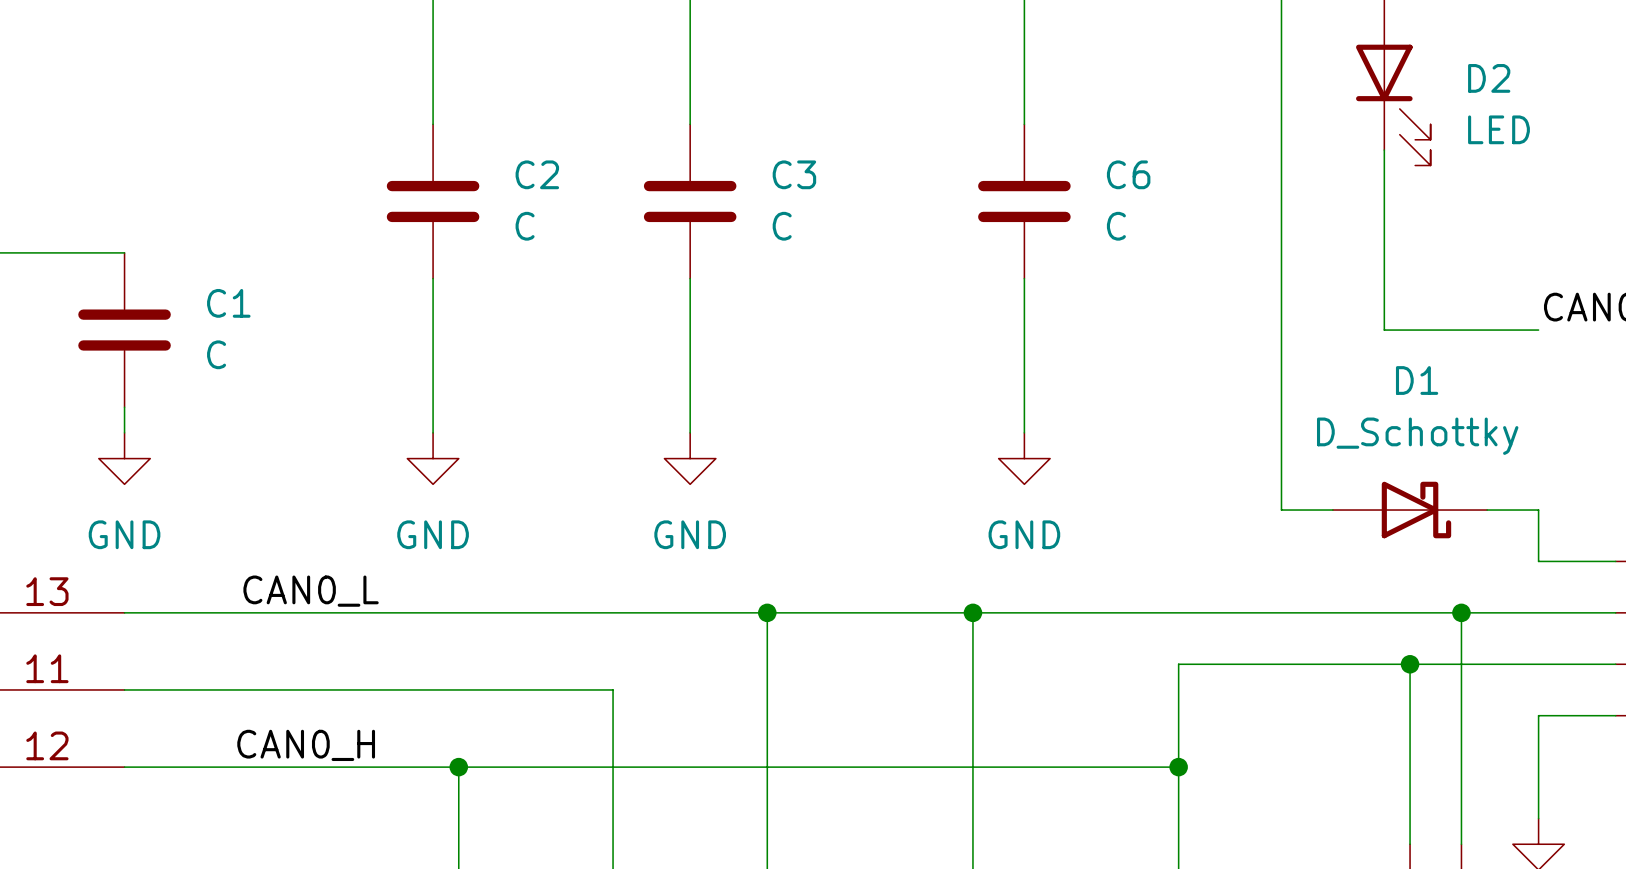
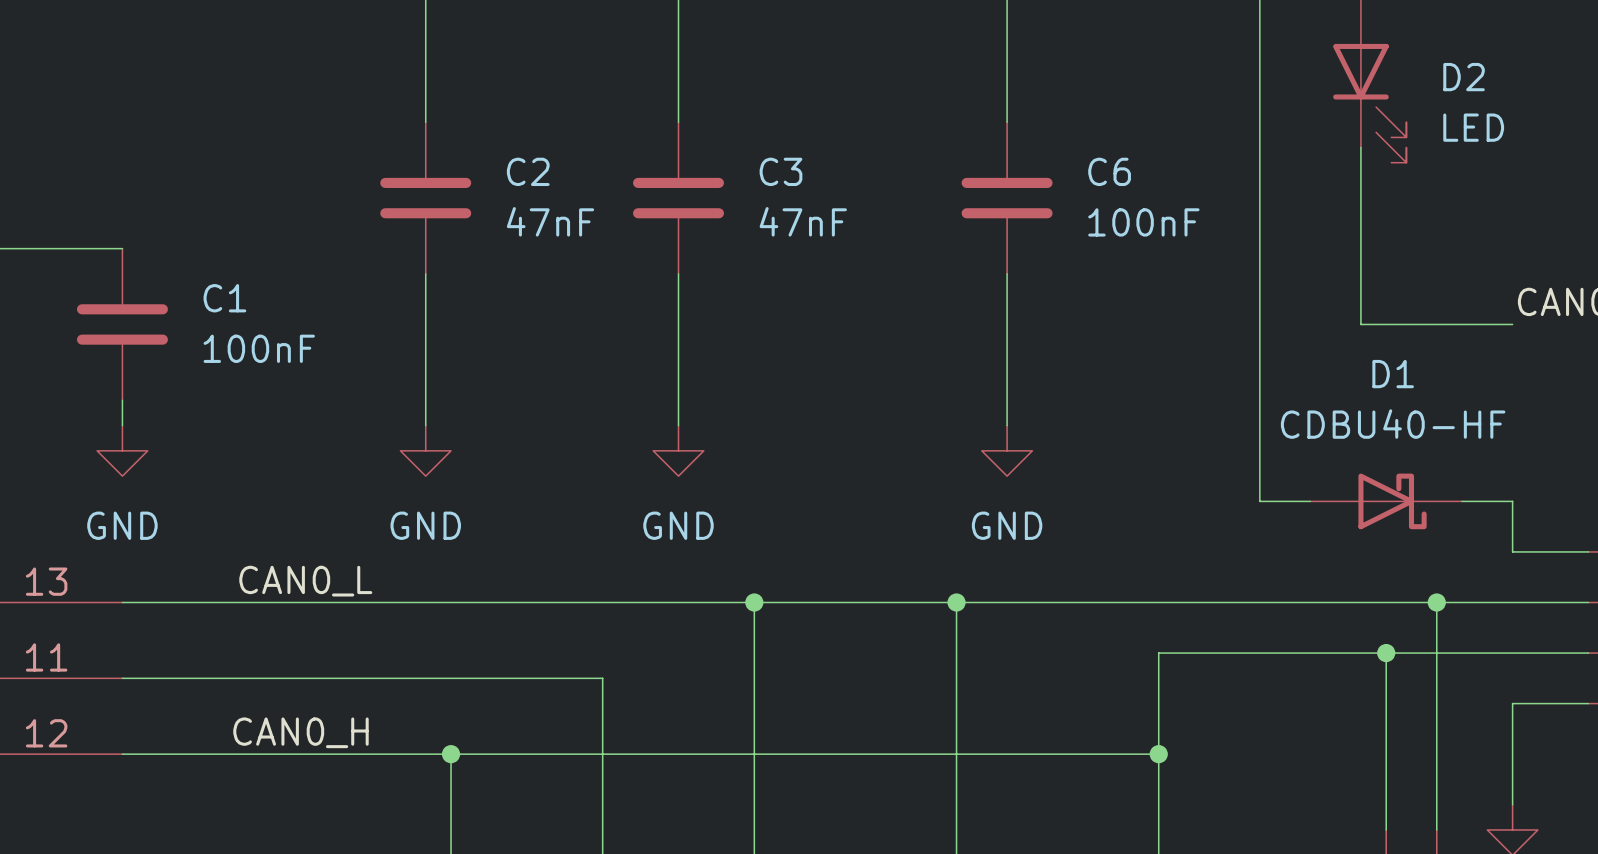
C2 value: C (525, 226) -> 47nF (550, 221)
C3 value: C (782, 226) -> 47nF (803, 221)
C6 value: C (1116, 226) -> 100nF (1143, 222)
C1 value: C (216, 354) -> 100nF (259, 348)
D1 value: D_Schottky (1417, 436) -> CDBU40-HF (1393, 424)

